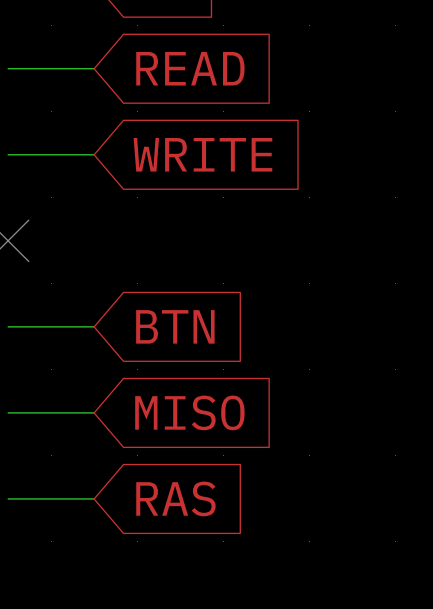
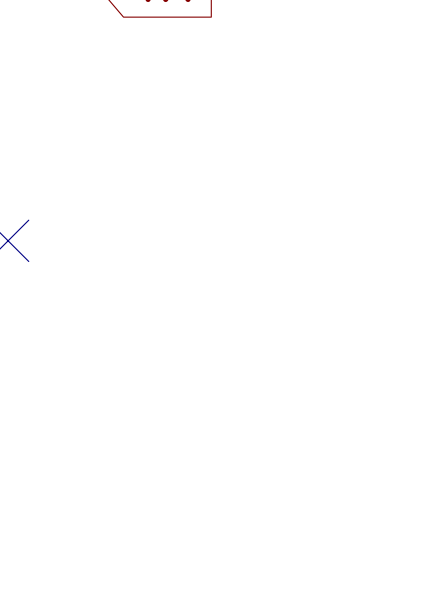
wire: (8, 68) (94, 68) -> none
global label: READ (190, 68) -> none
wire: (8, 154) (94, 154) -> none
global label: WRITE (202, 154) -> none
wire: (8, 326) (94, 326) -> none
global label: BTN (175, 326) -> none
wire: (8, 412) (94, 412) -> none
global label: MISO (189, 412) -> none
wire: (8, 498) (94, 498) -> none
global label: RAS (175, 498) -> none

